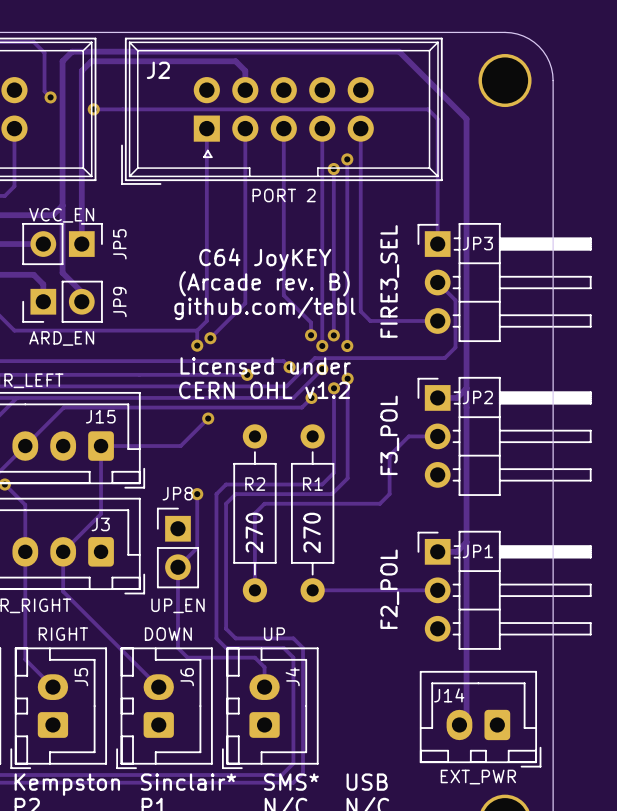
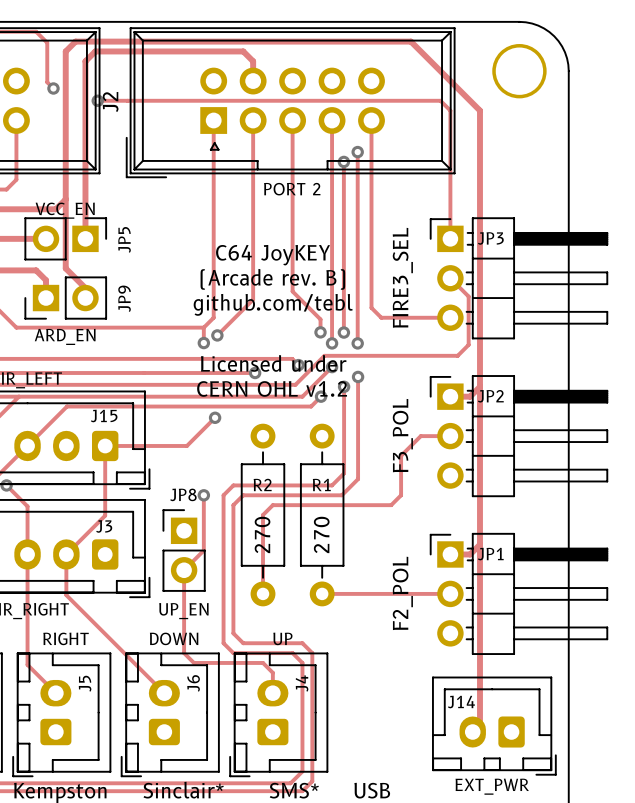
J2 name rotation: 0° (158, 70) -> 90° counterclockwise (110, 102)
J2 name position: J2 (158, 70) -> J2 (110, 102)

